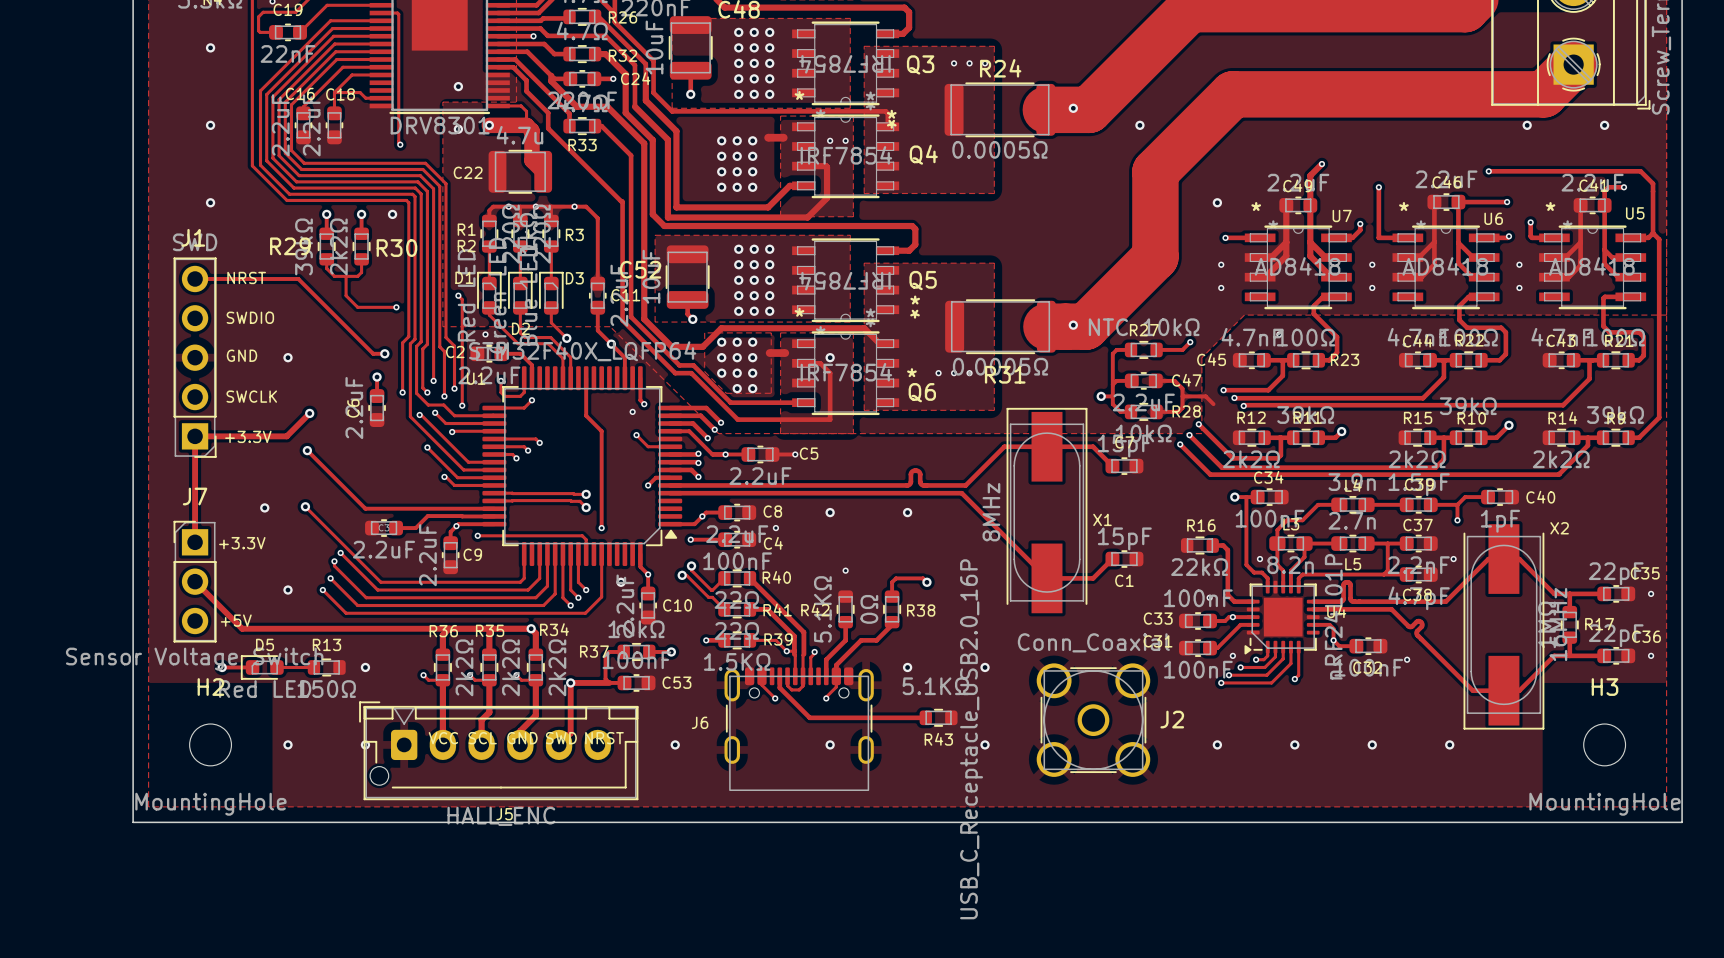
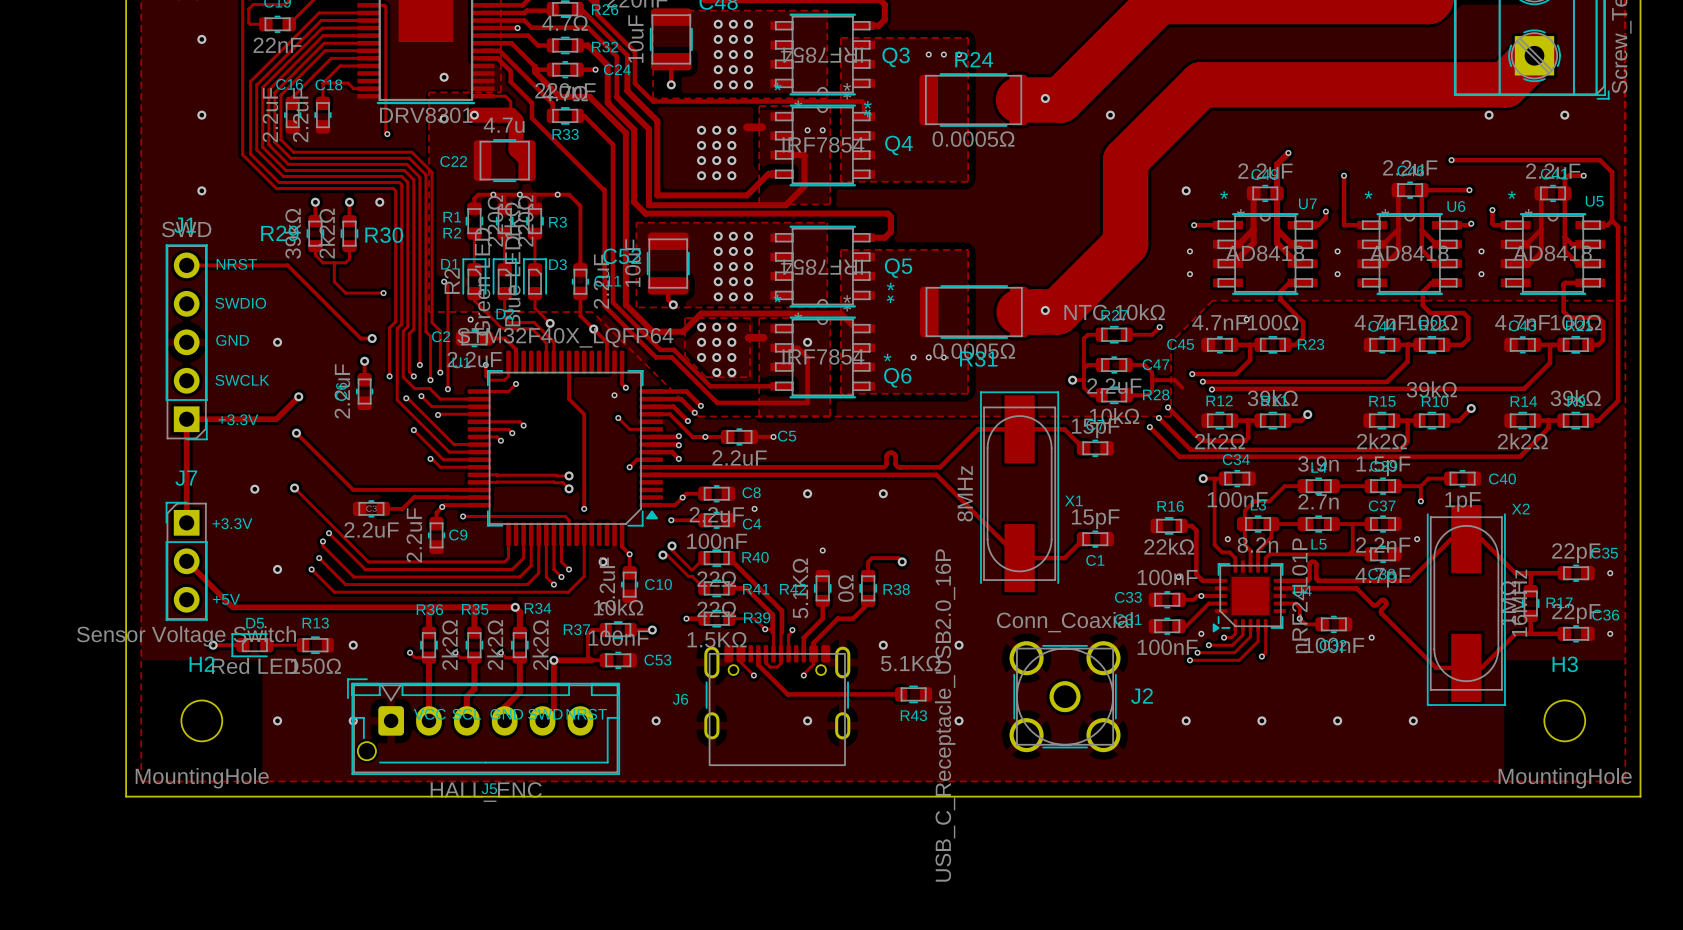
D1 value: Red LED (466, 295) -> R2 (452, 281)

